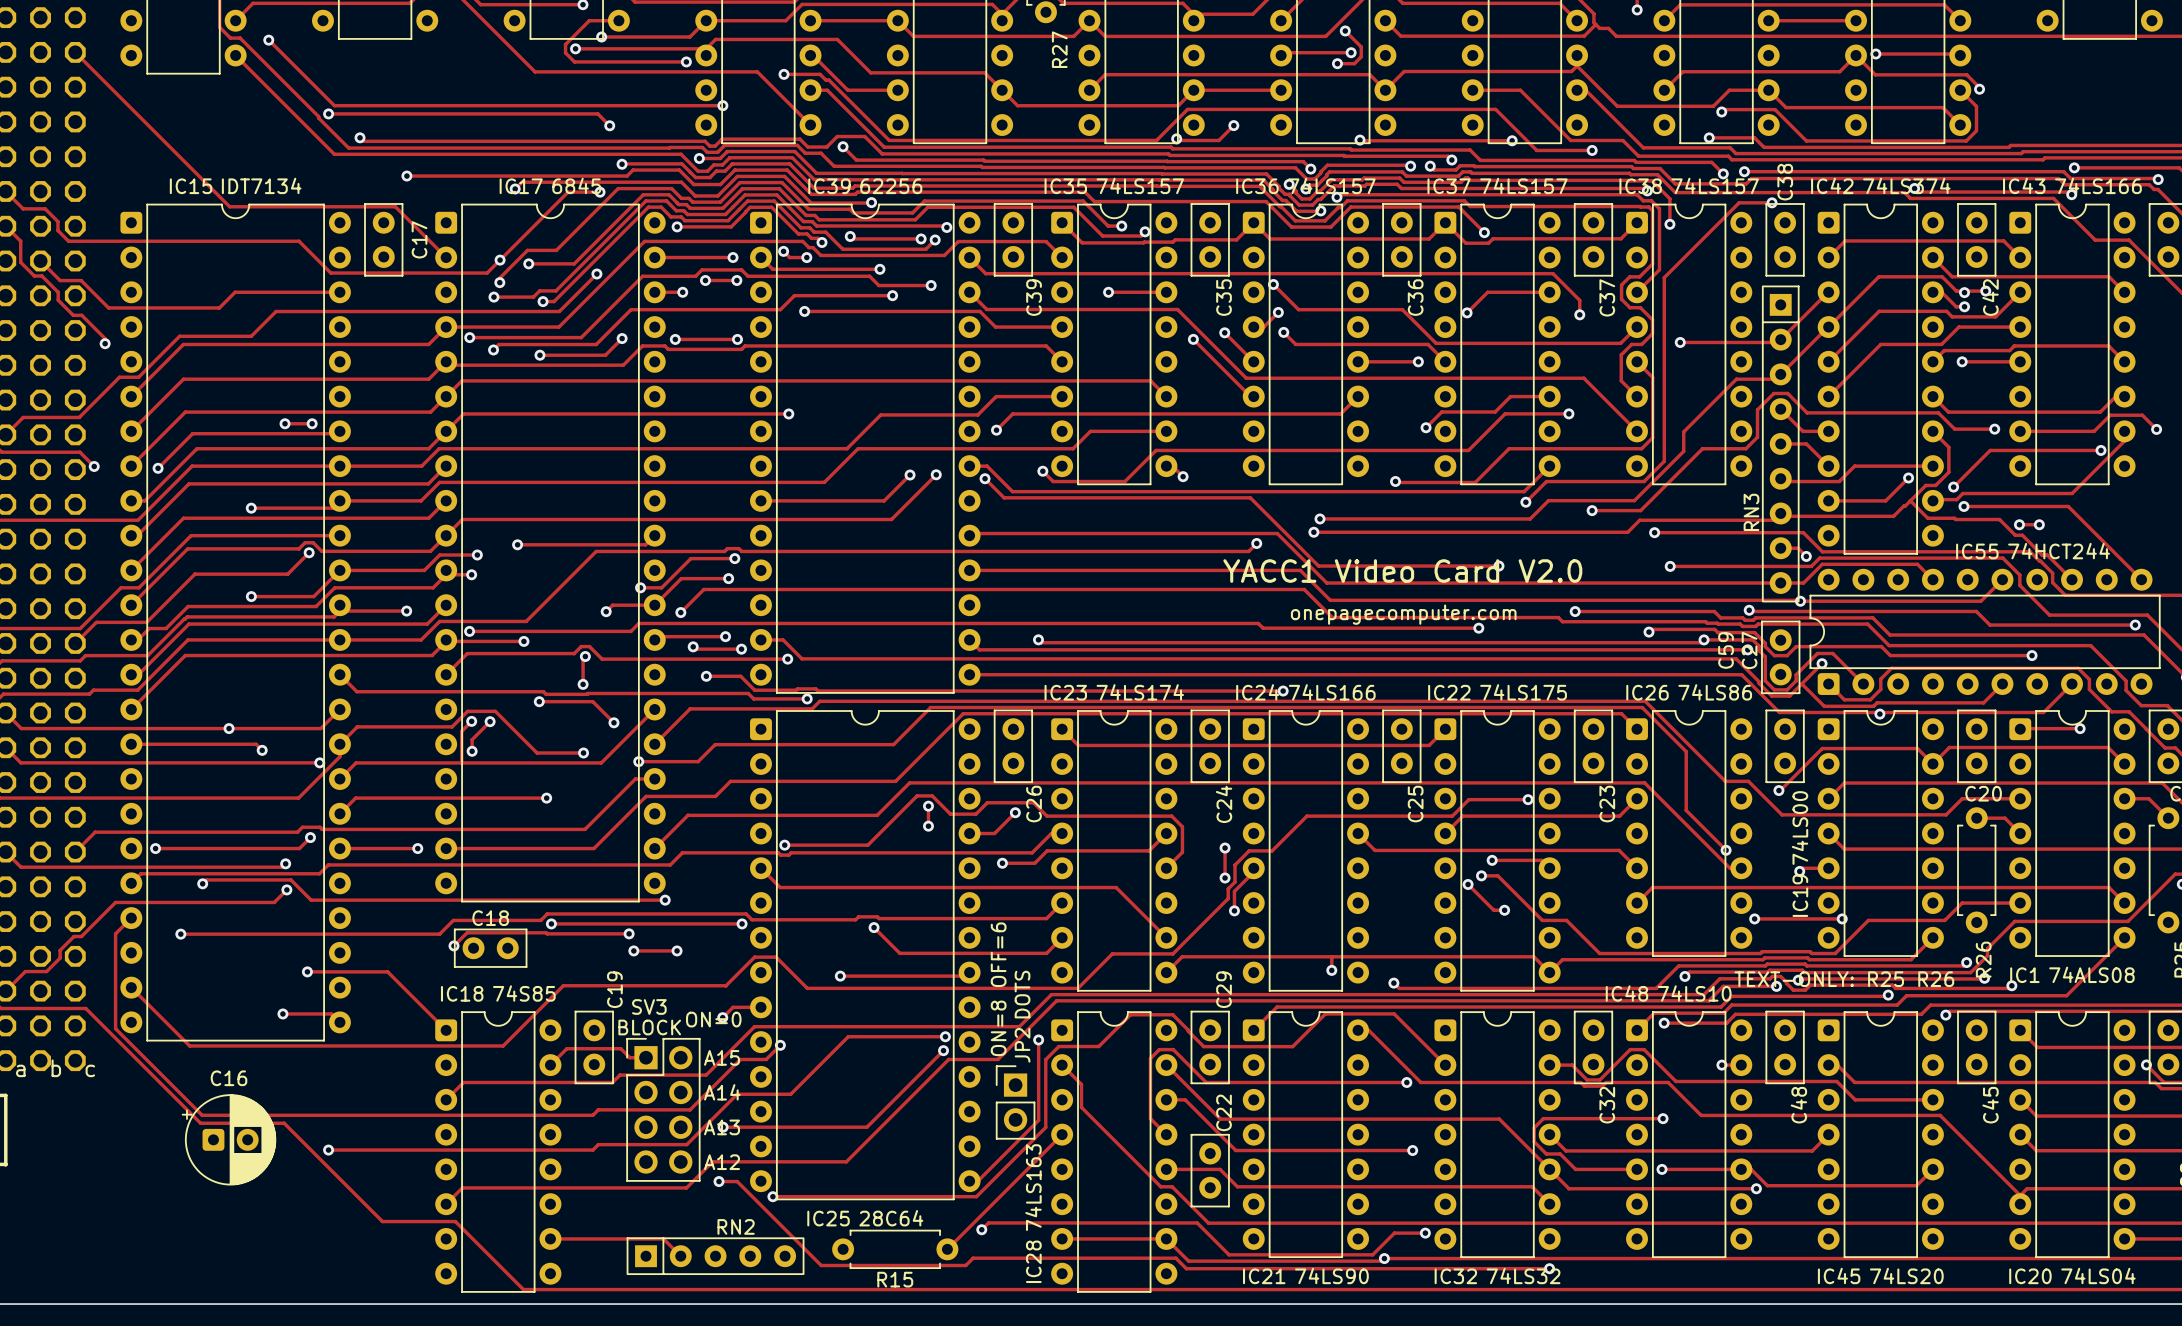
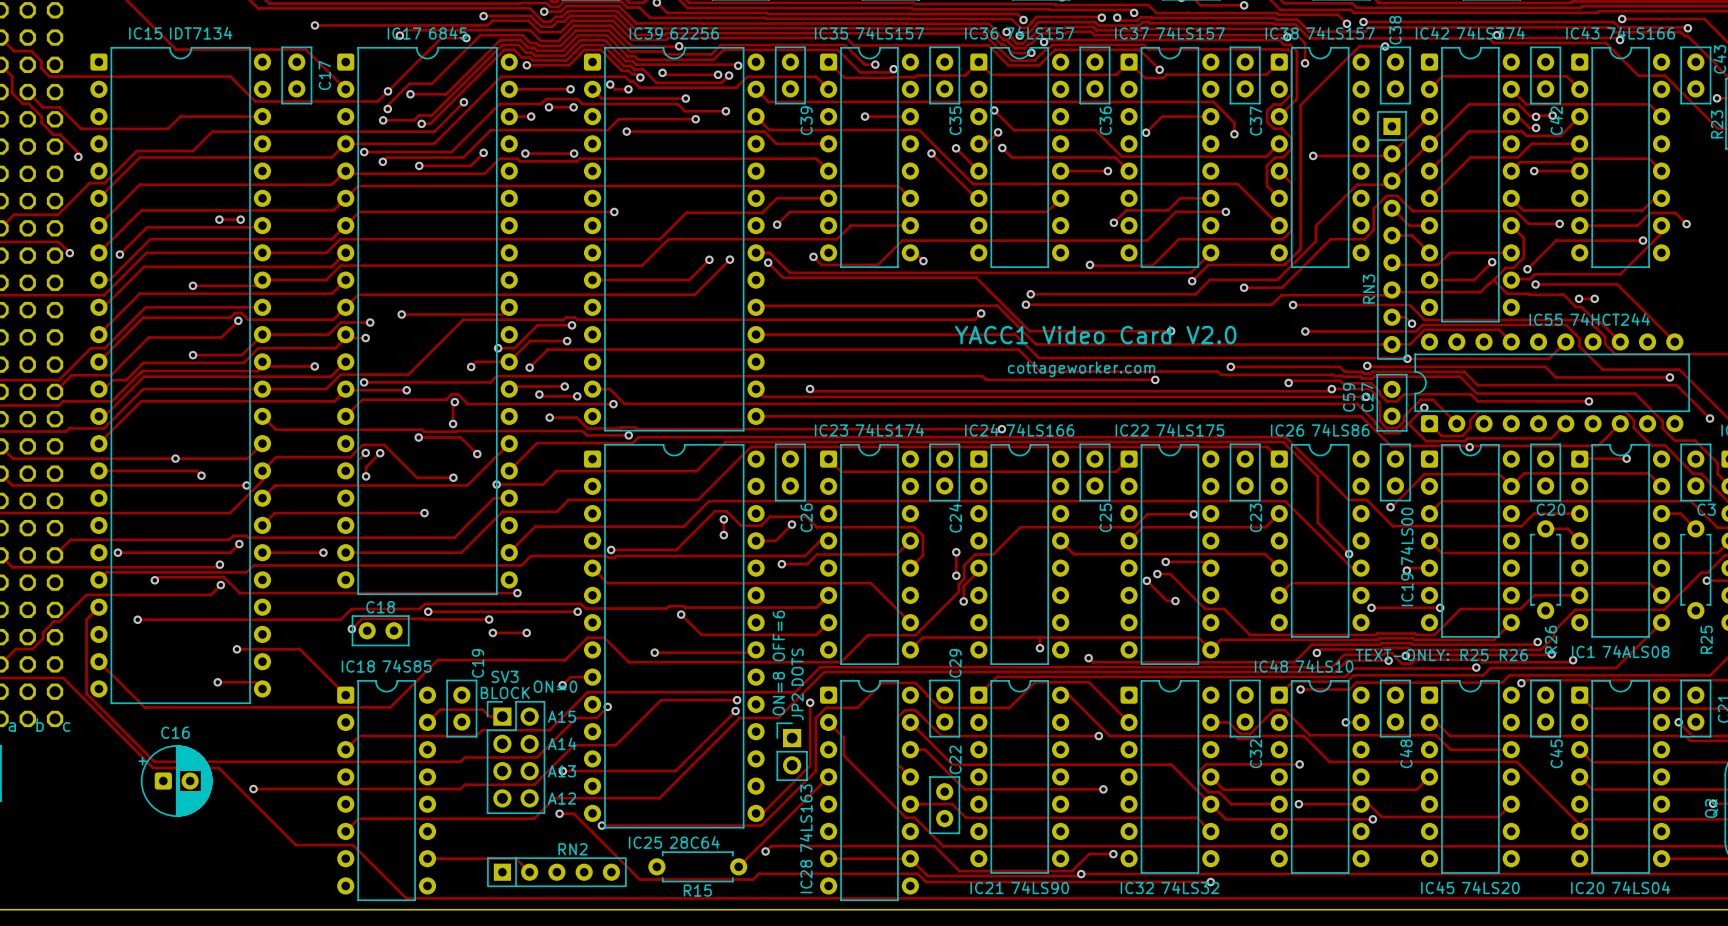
text: onepagecomputer.com (1403, 614) -> cottageworker.com (1081, 369)

